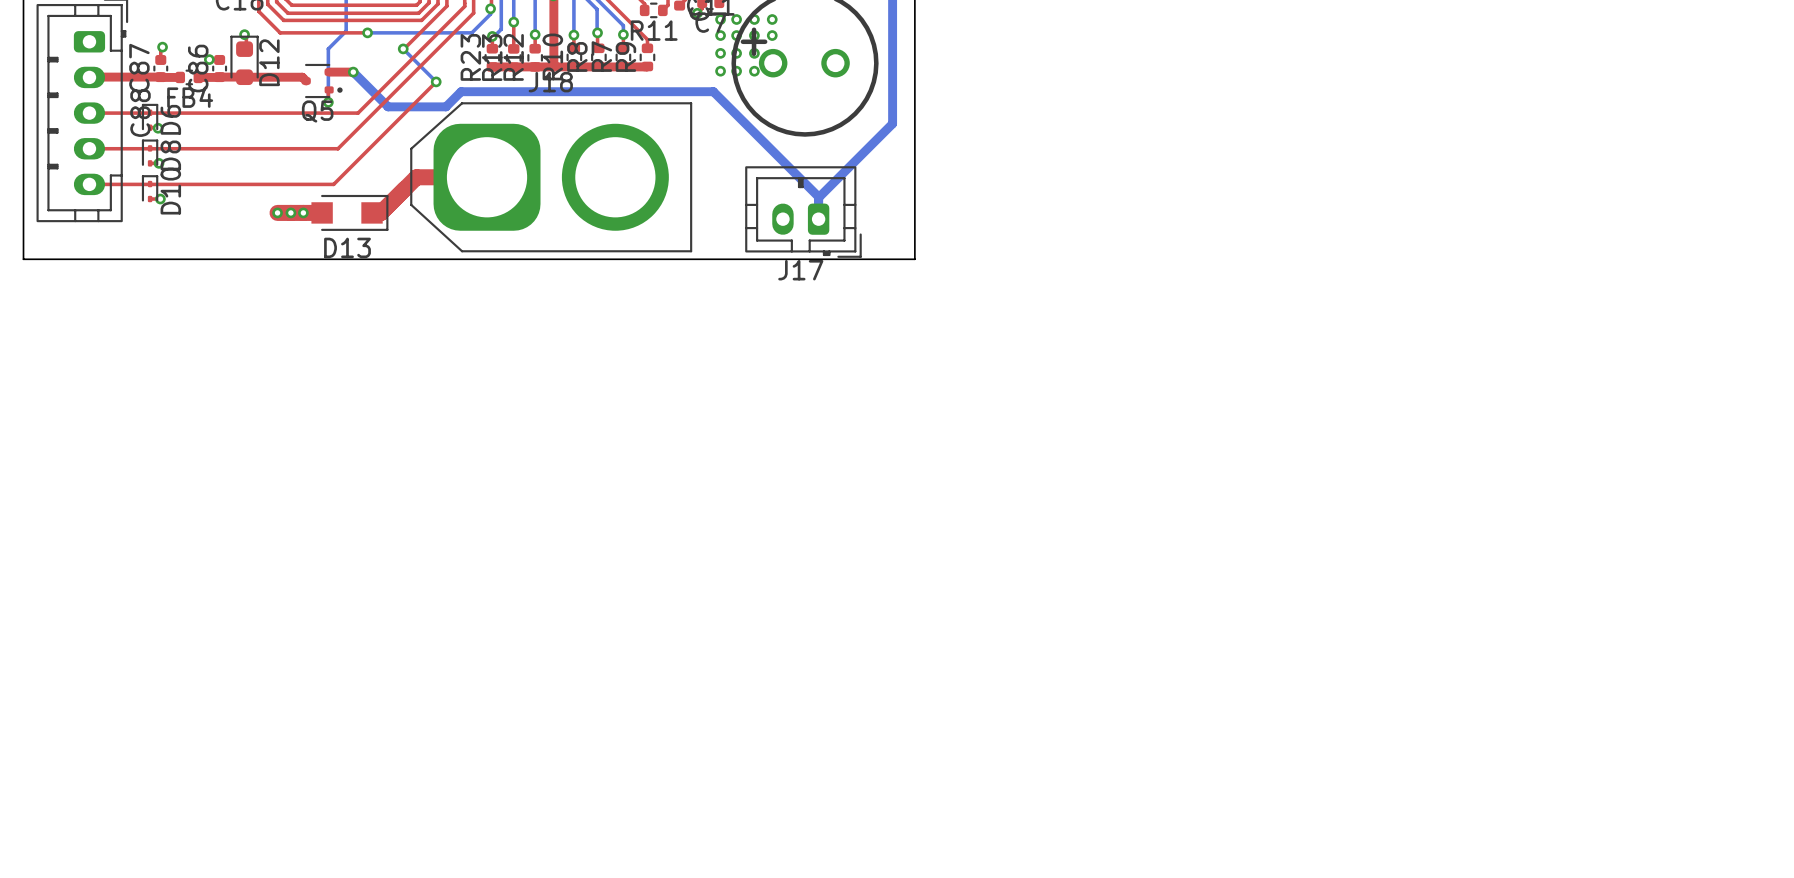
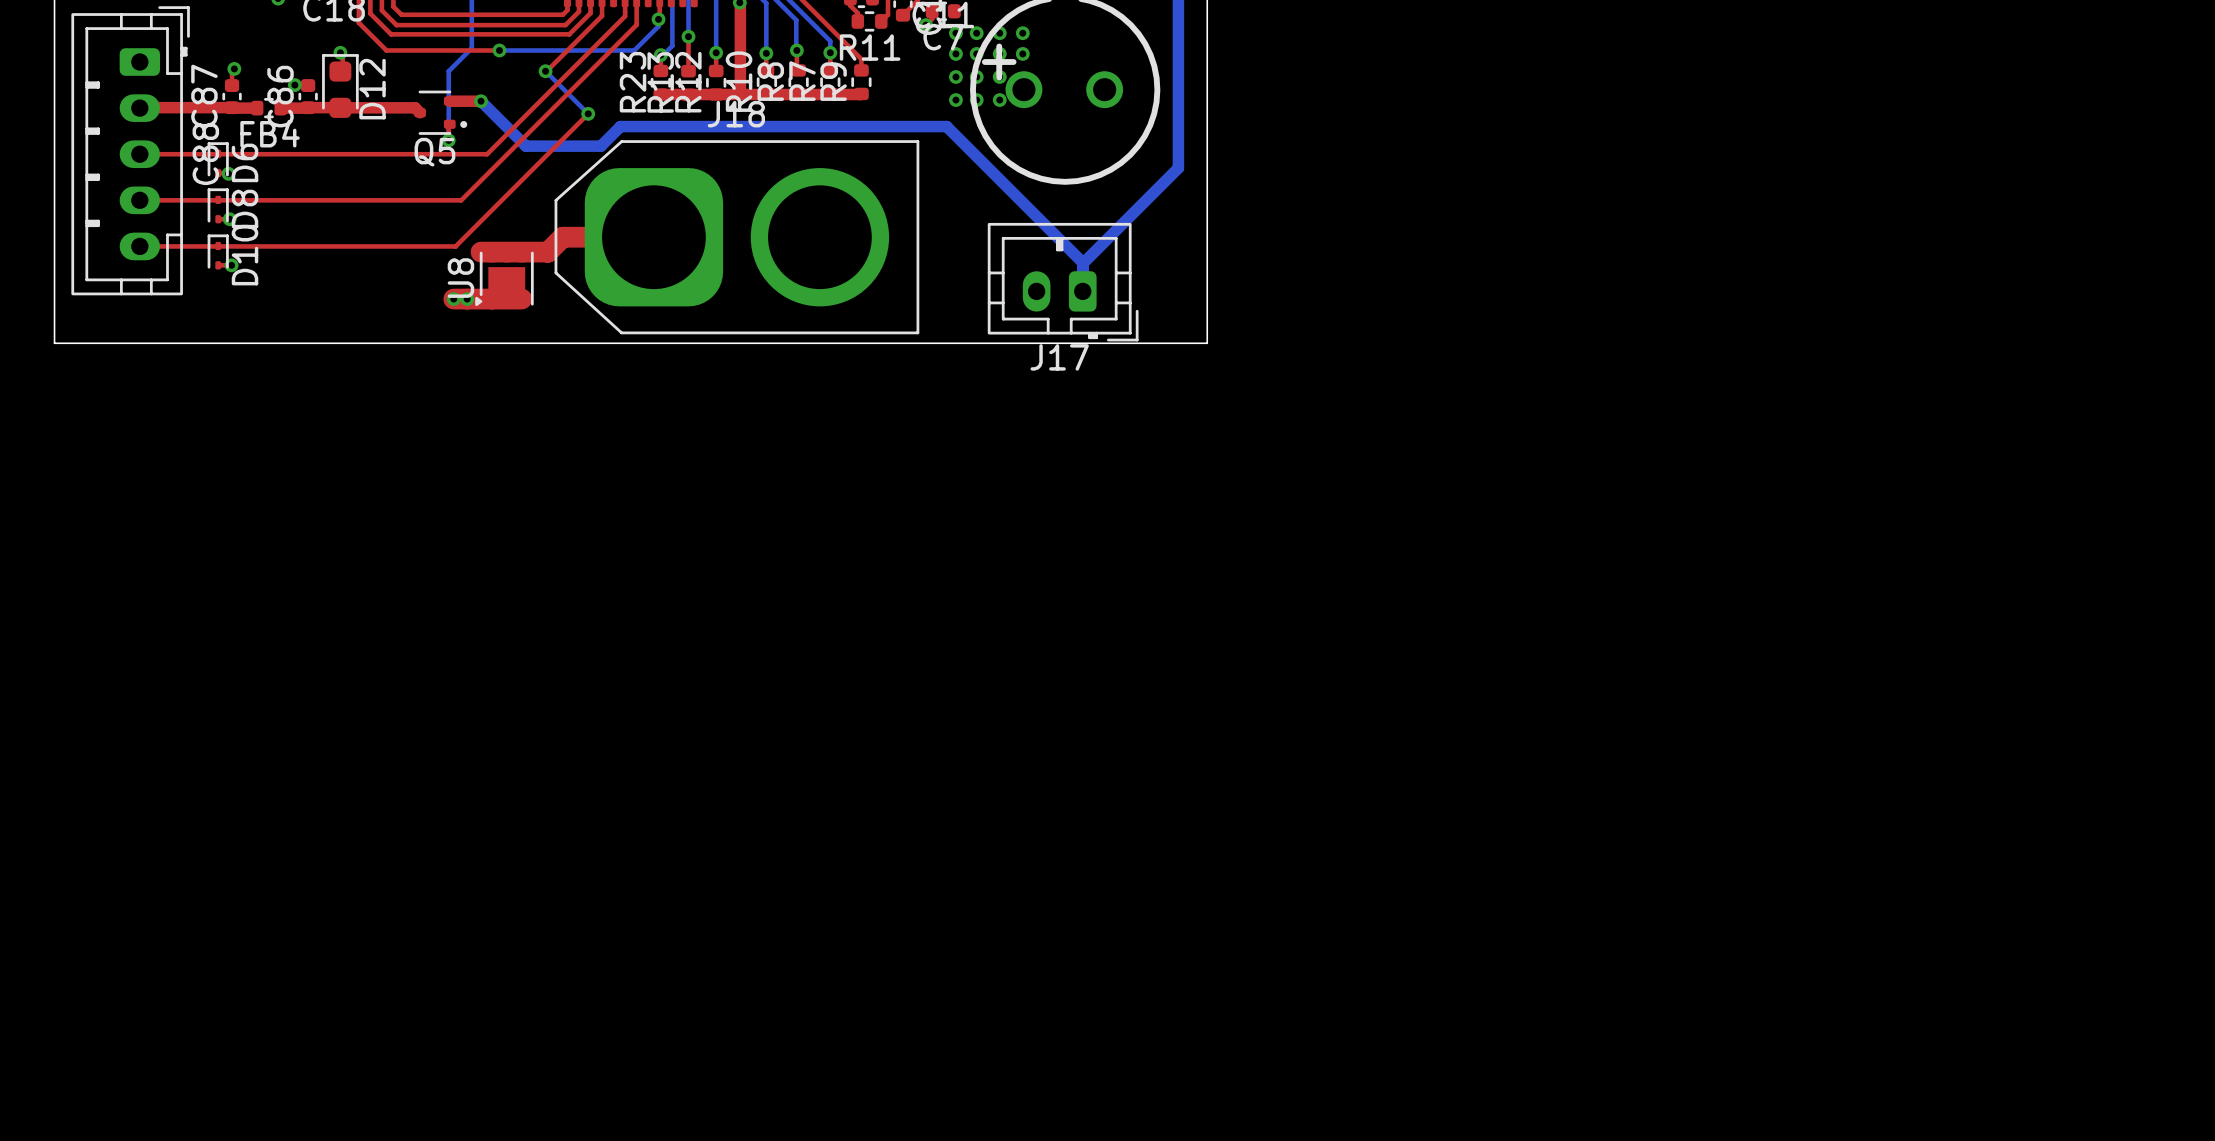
top track: none -> (481, 252) (547, 252)
U8: none -> (504, 278)
top track: (277, 212) (322, 212) -> none
via: (277, 212) -> none
via: (290, 212) -> none
via: (303, 212) -> none
D13: (349, 212) -> none
top track: (372, 212) (380, 212) (405, 188) (380, 212) -> none
top track: none -> (453, 299) (521, 299)
via: none -> (453, 299)
via: none -> (467, 299)

